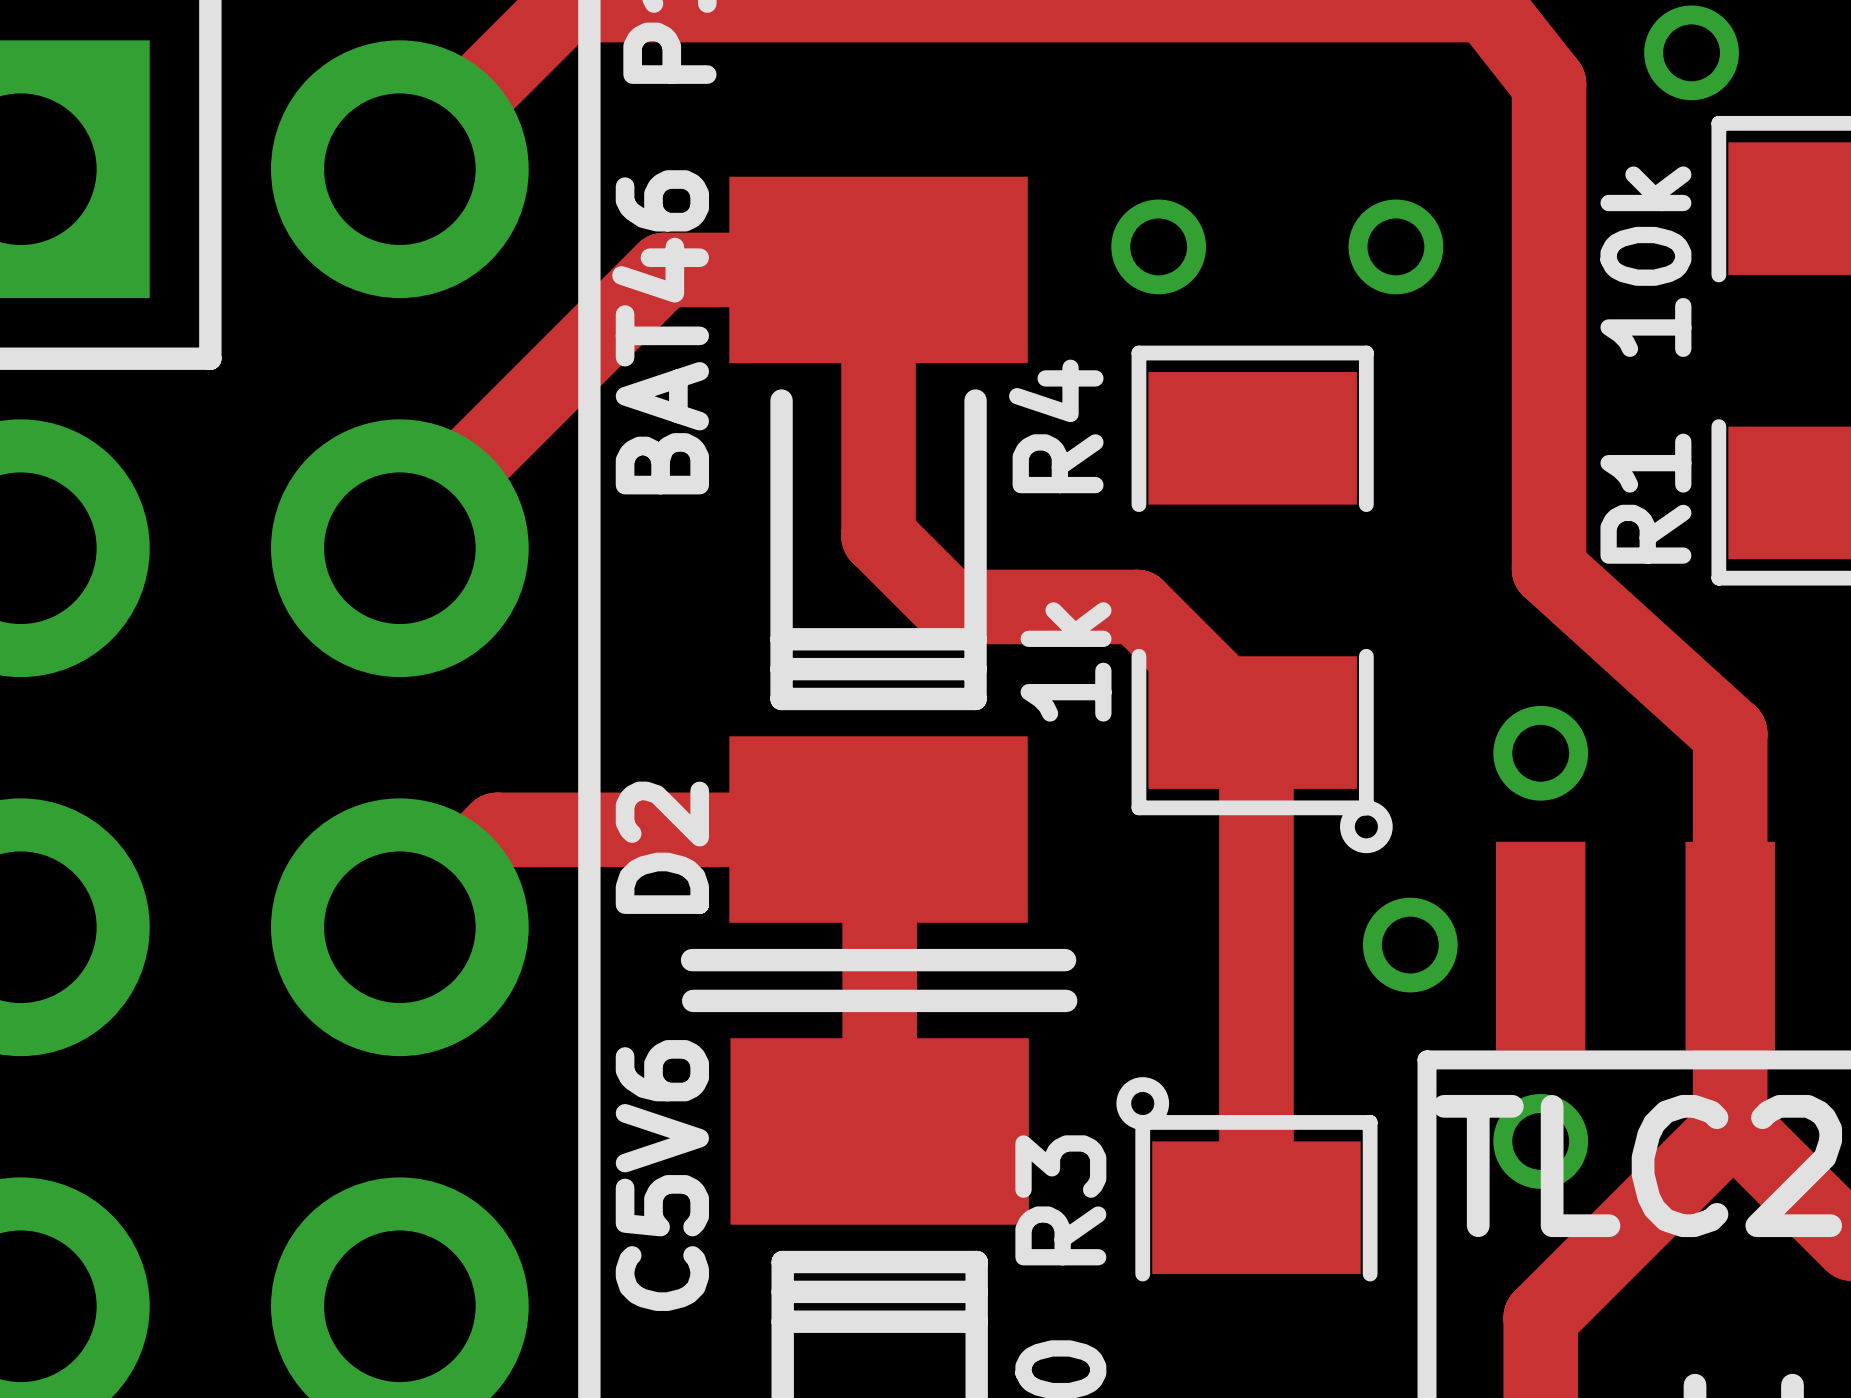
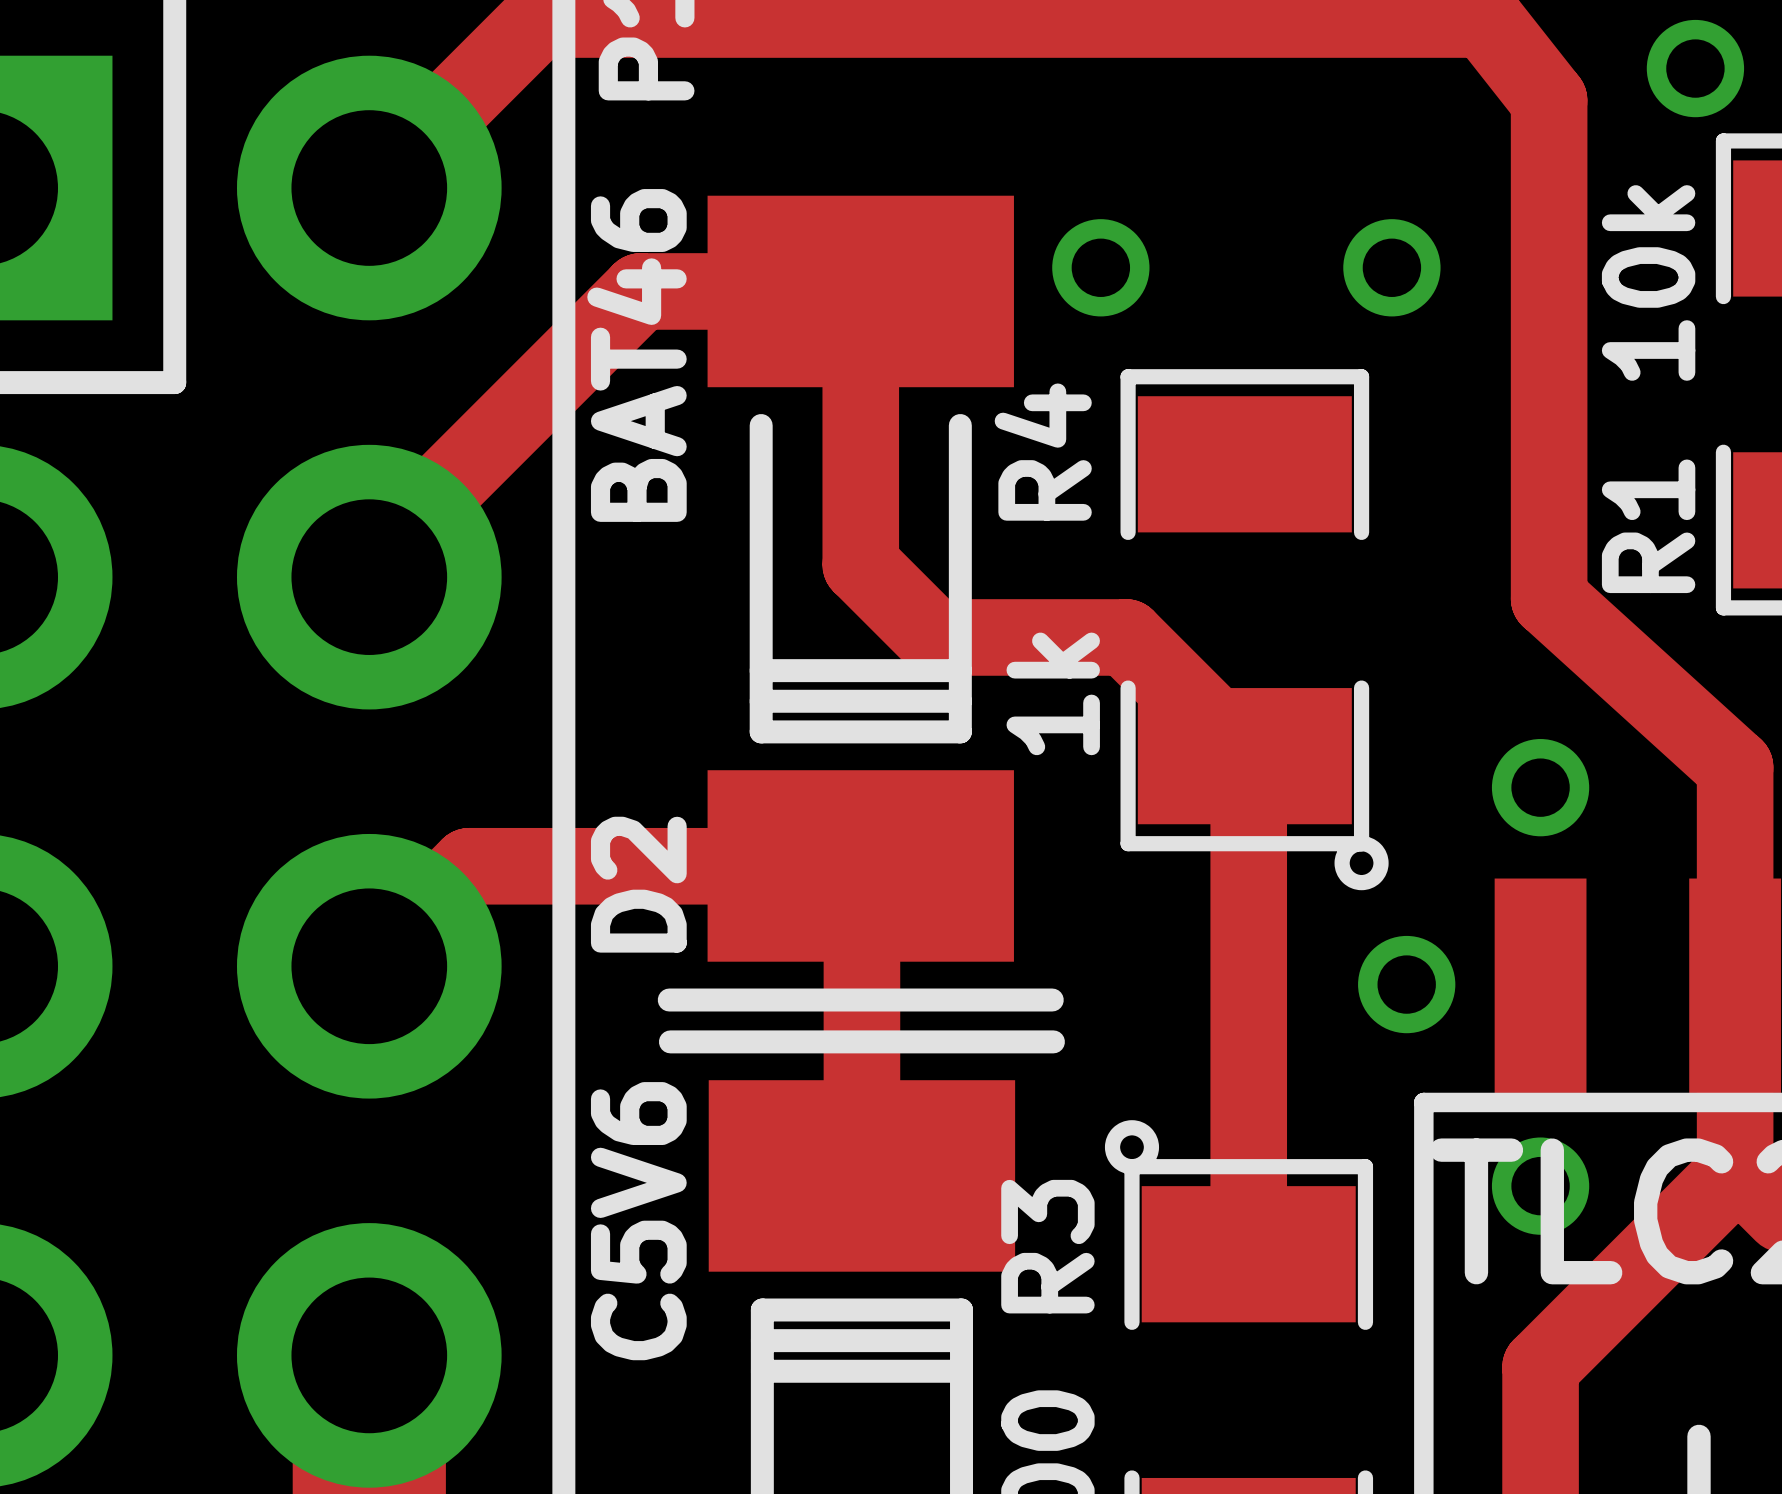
part position: (1158, 246) -> (1100, 267)

